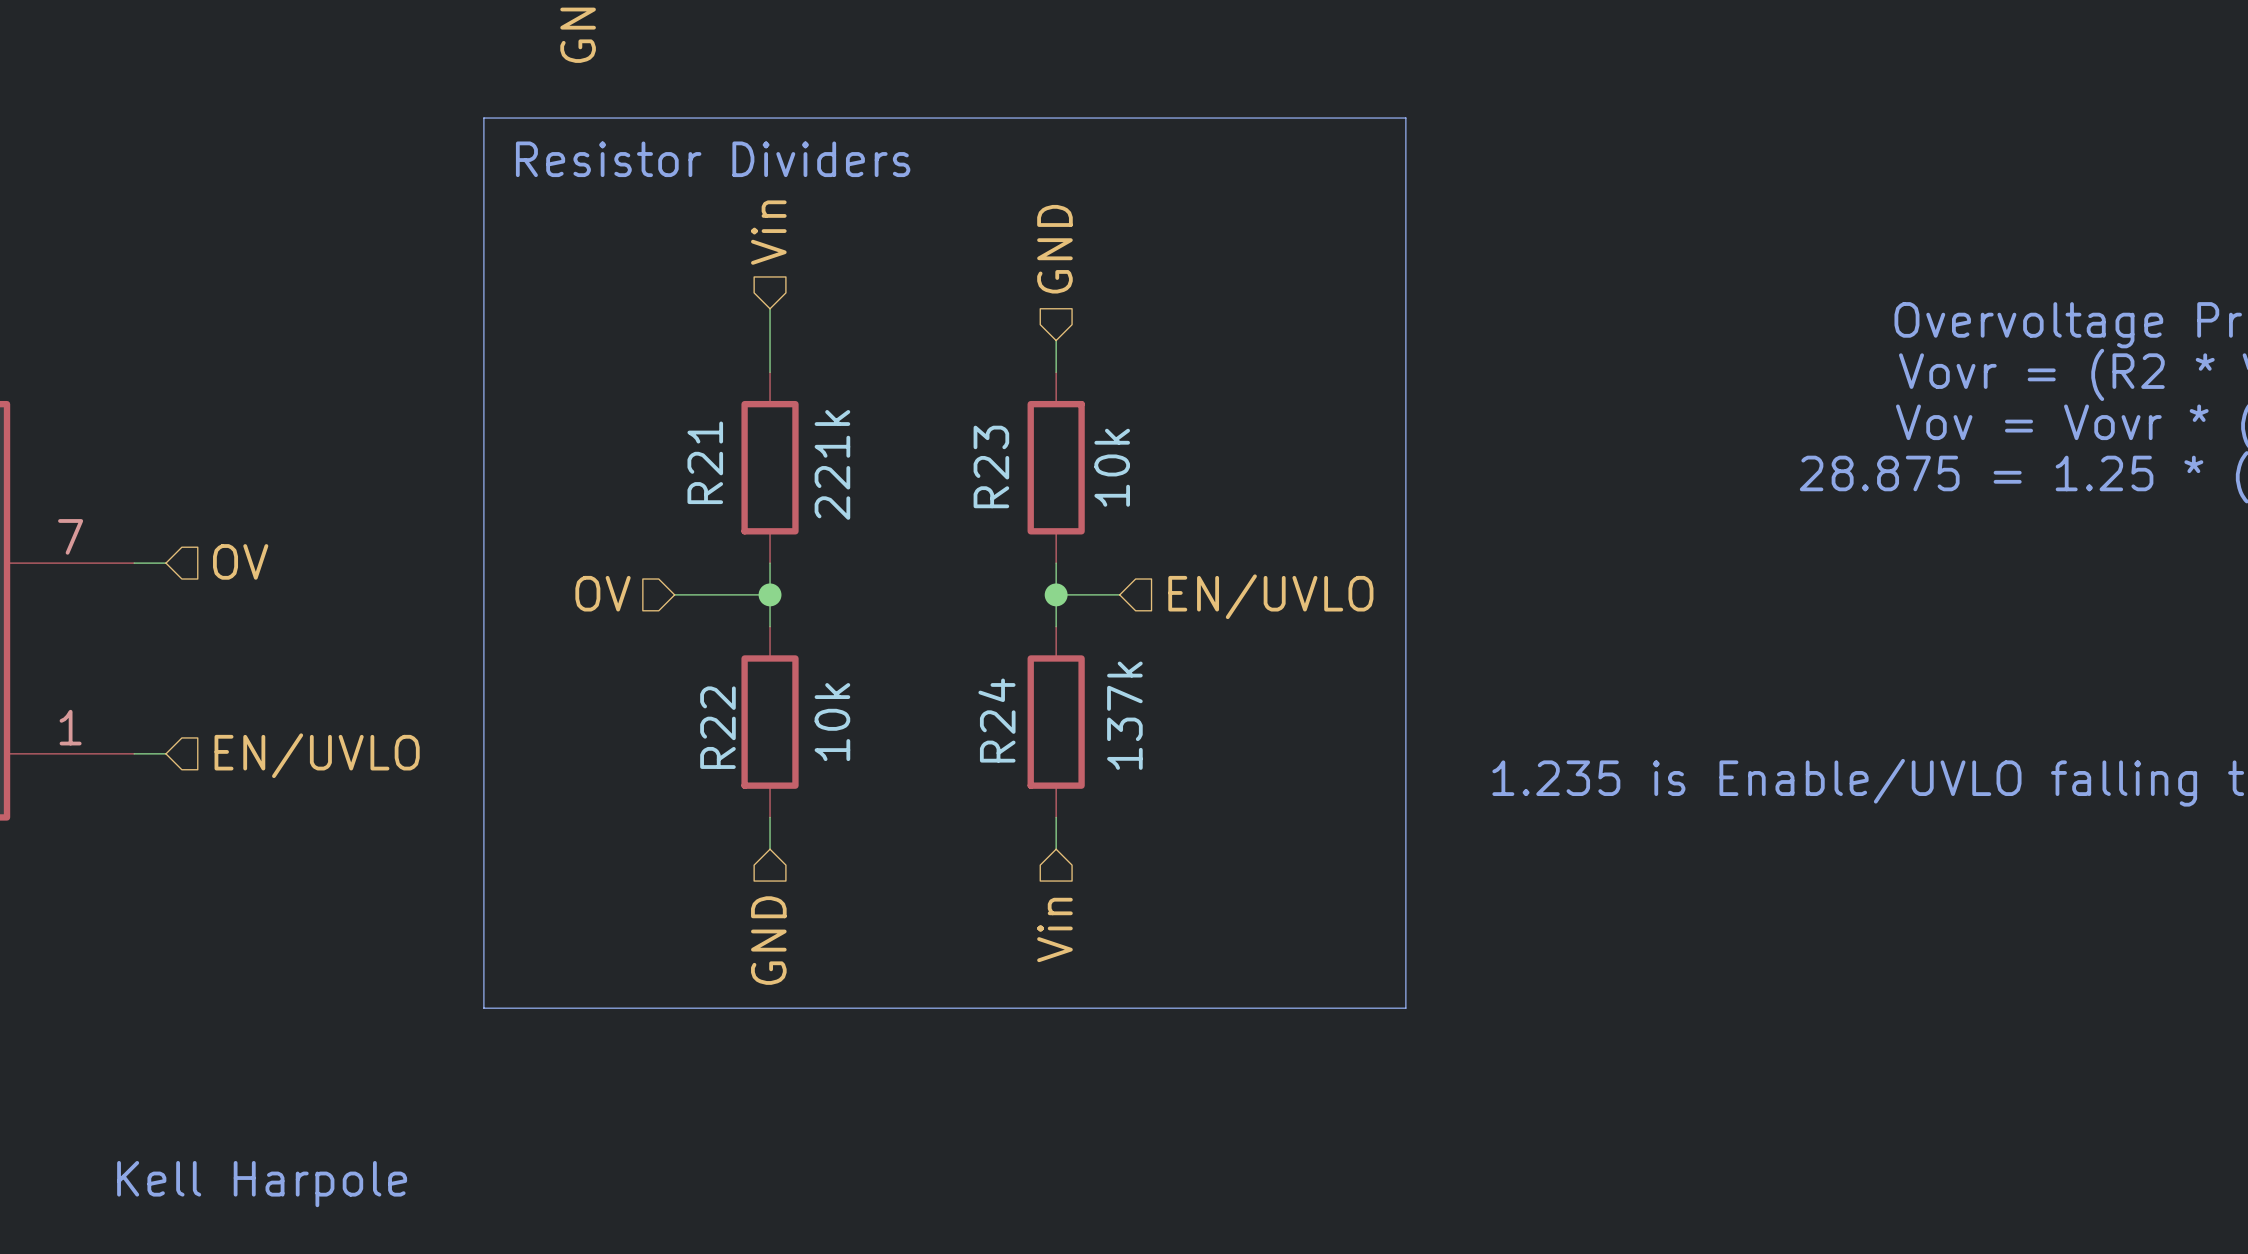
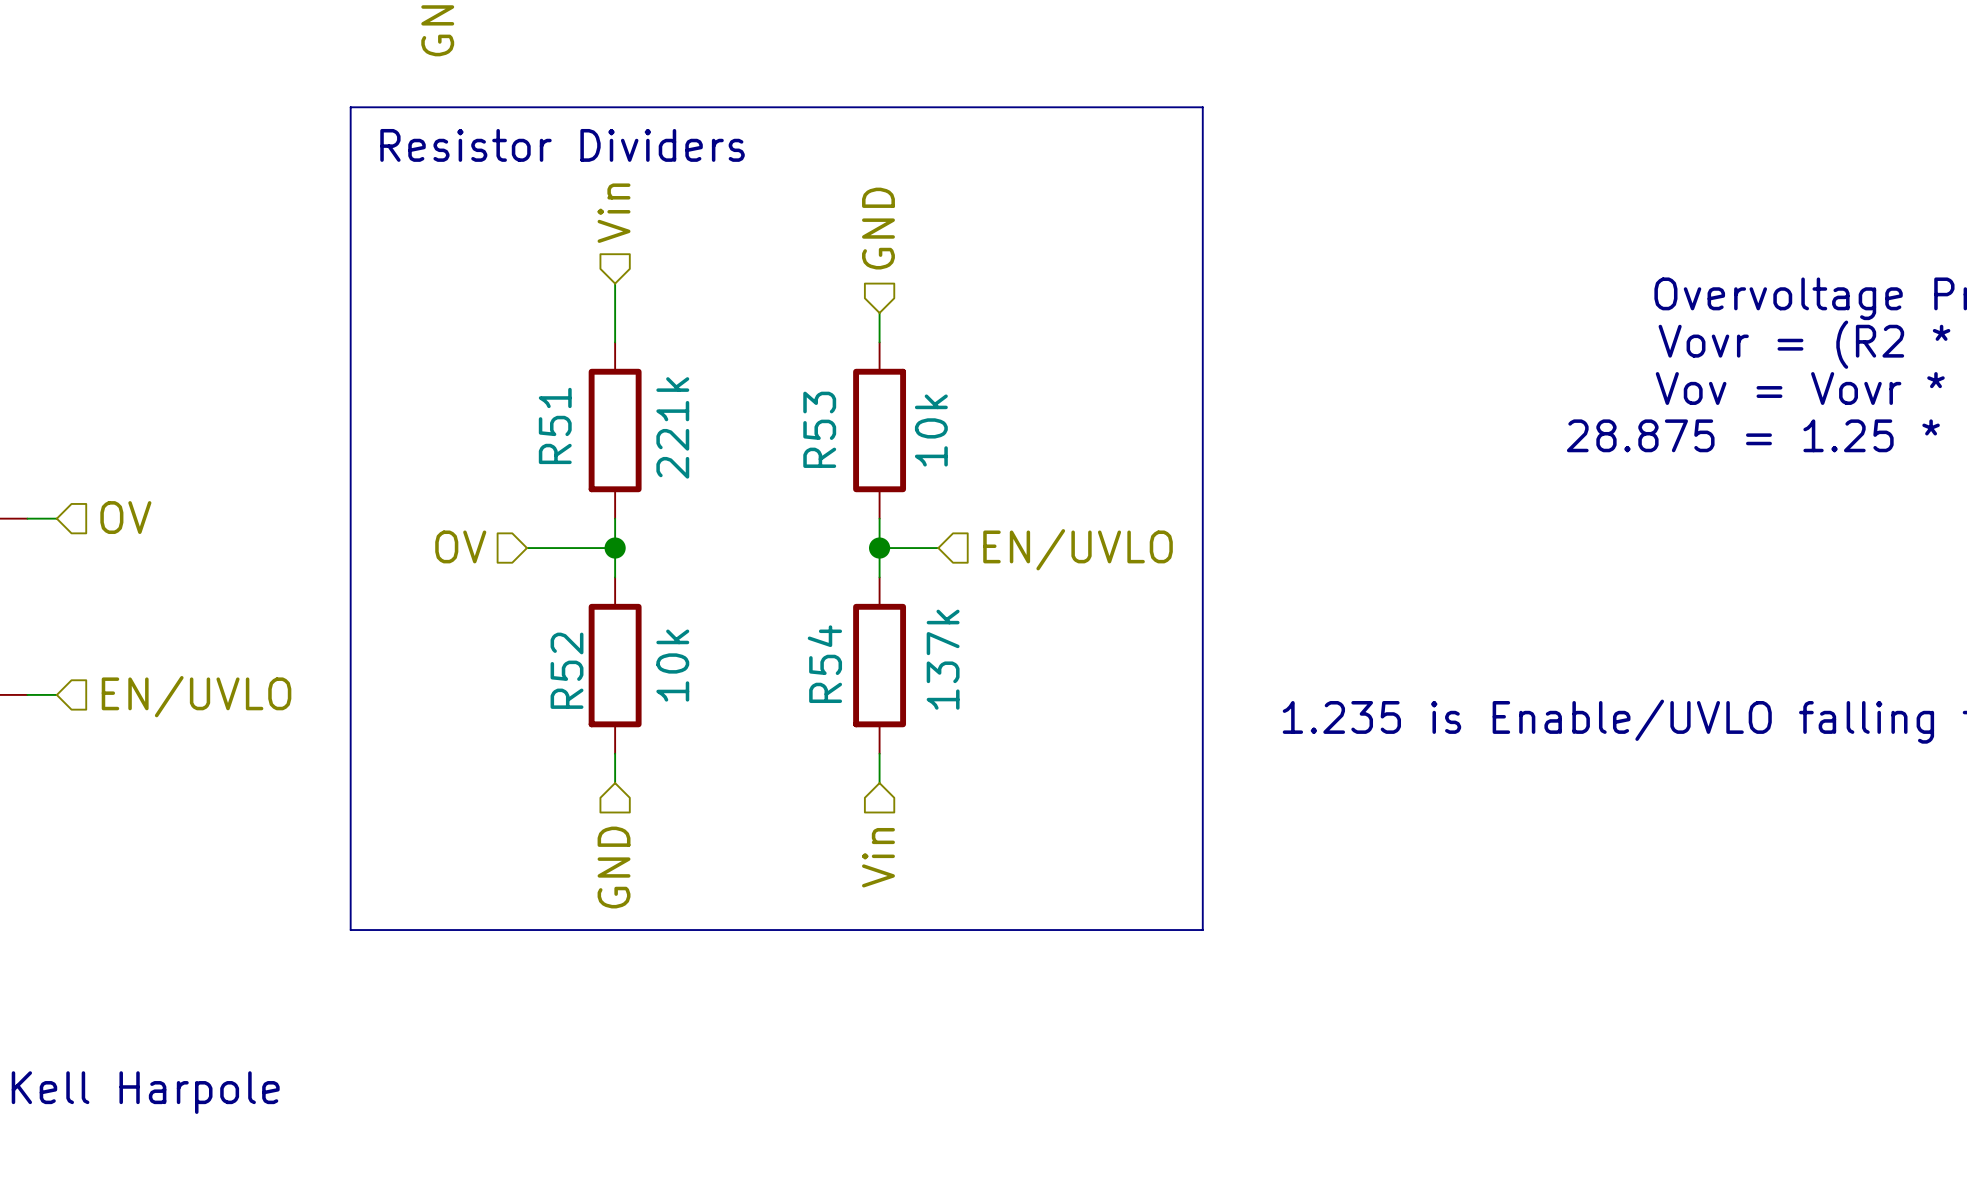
R21 name: R21 (705, 462) -> R51 (555, 425)
R23 name: R23 (991, 466) -> R53 (819, 429)
R24 name: R24 (996, 720) -> R54 (824, 664)
R22 name: R22 (717, 727) -> R52 (567, 670)

